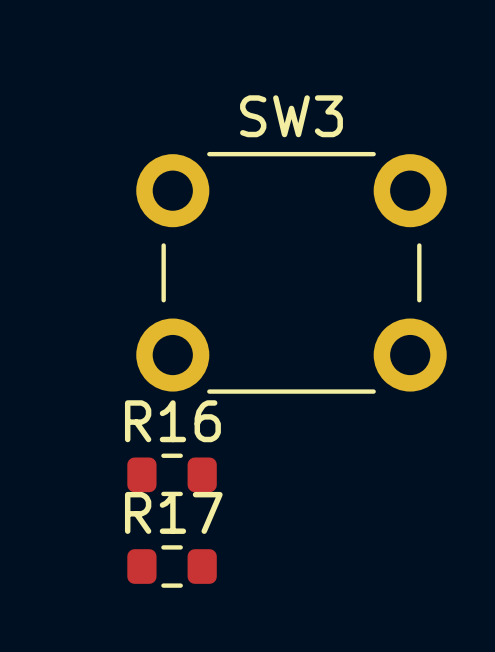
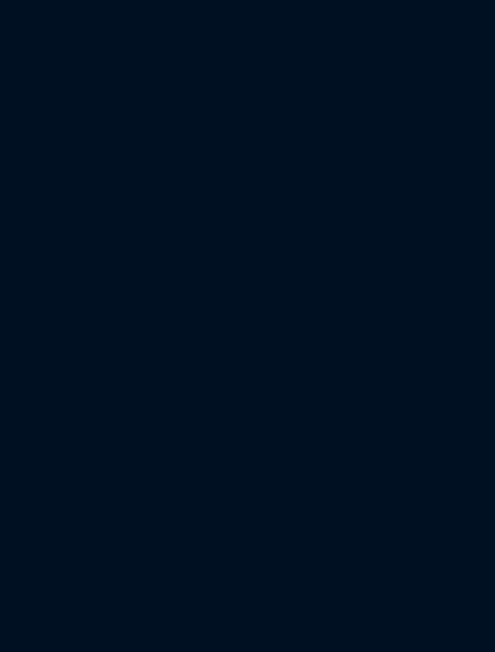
SW3: (291, 272) -> none
R16: (172, 474) -> none
R17: (172, 566) -> none

